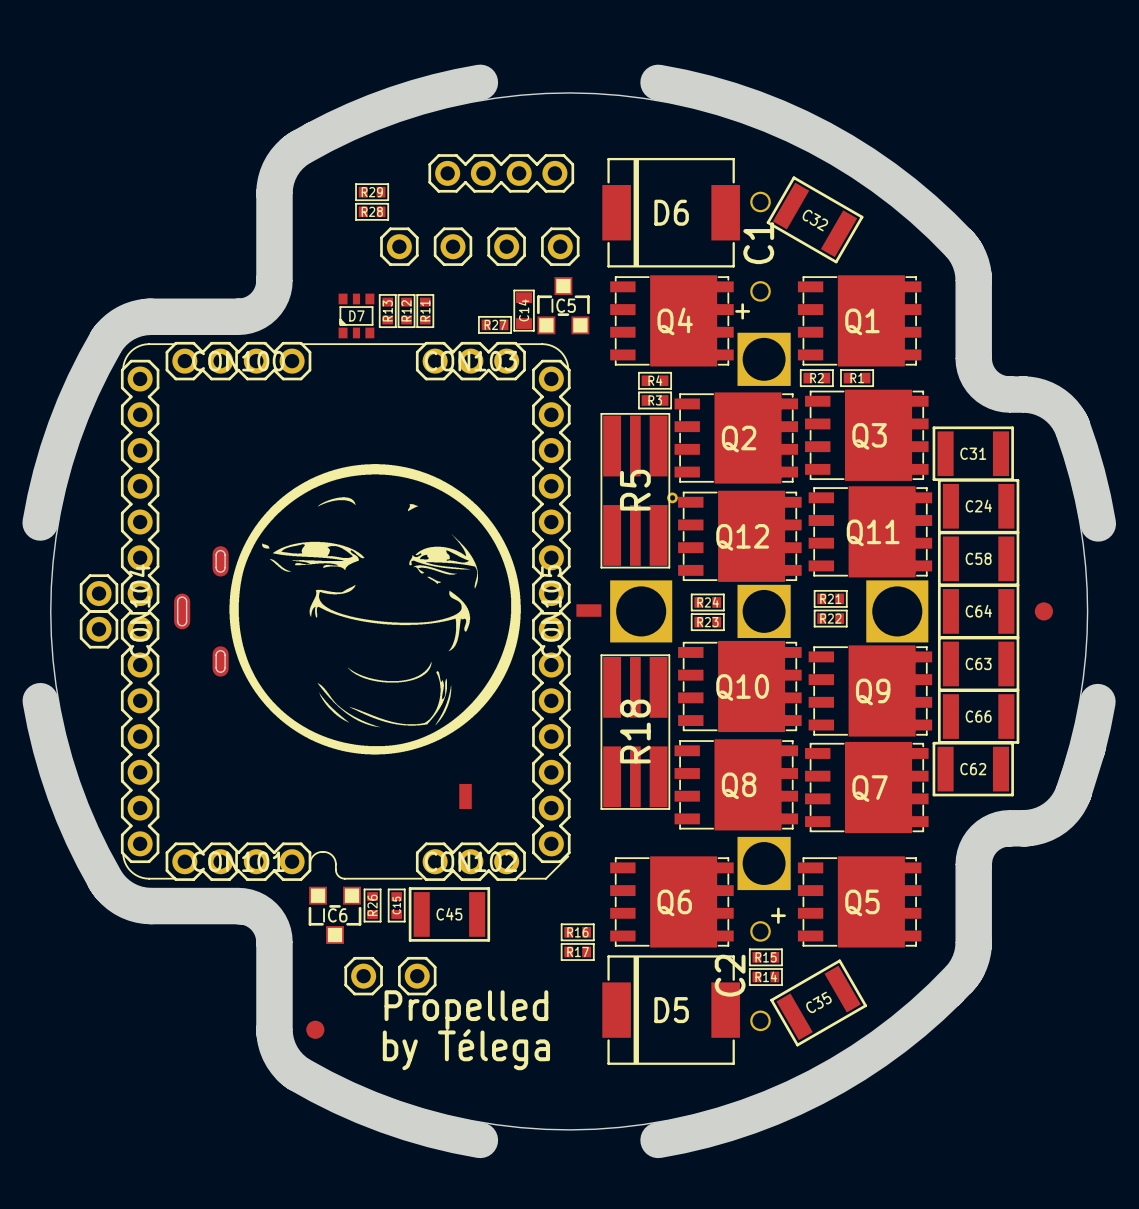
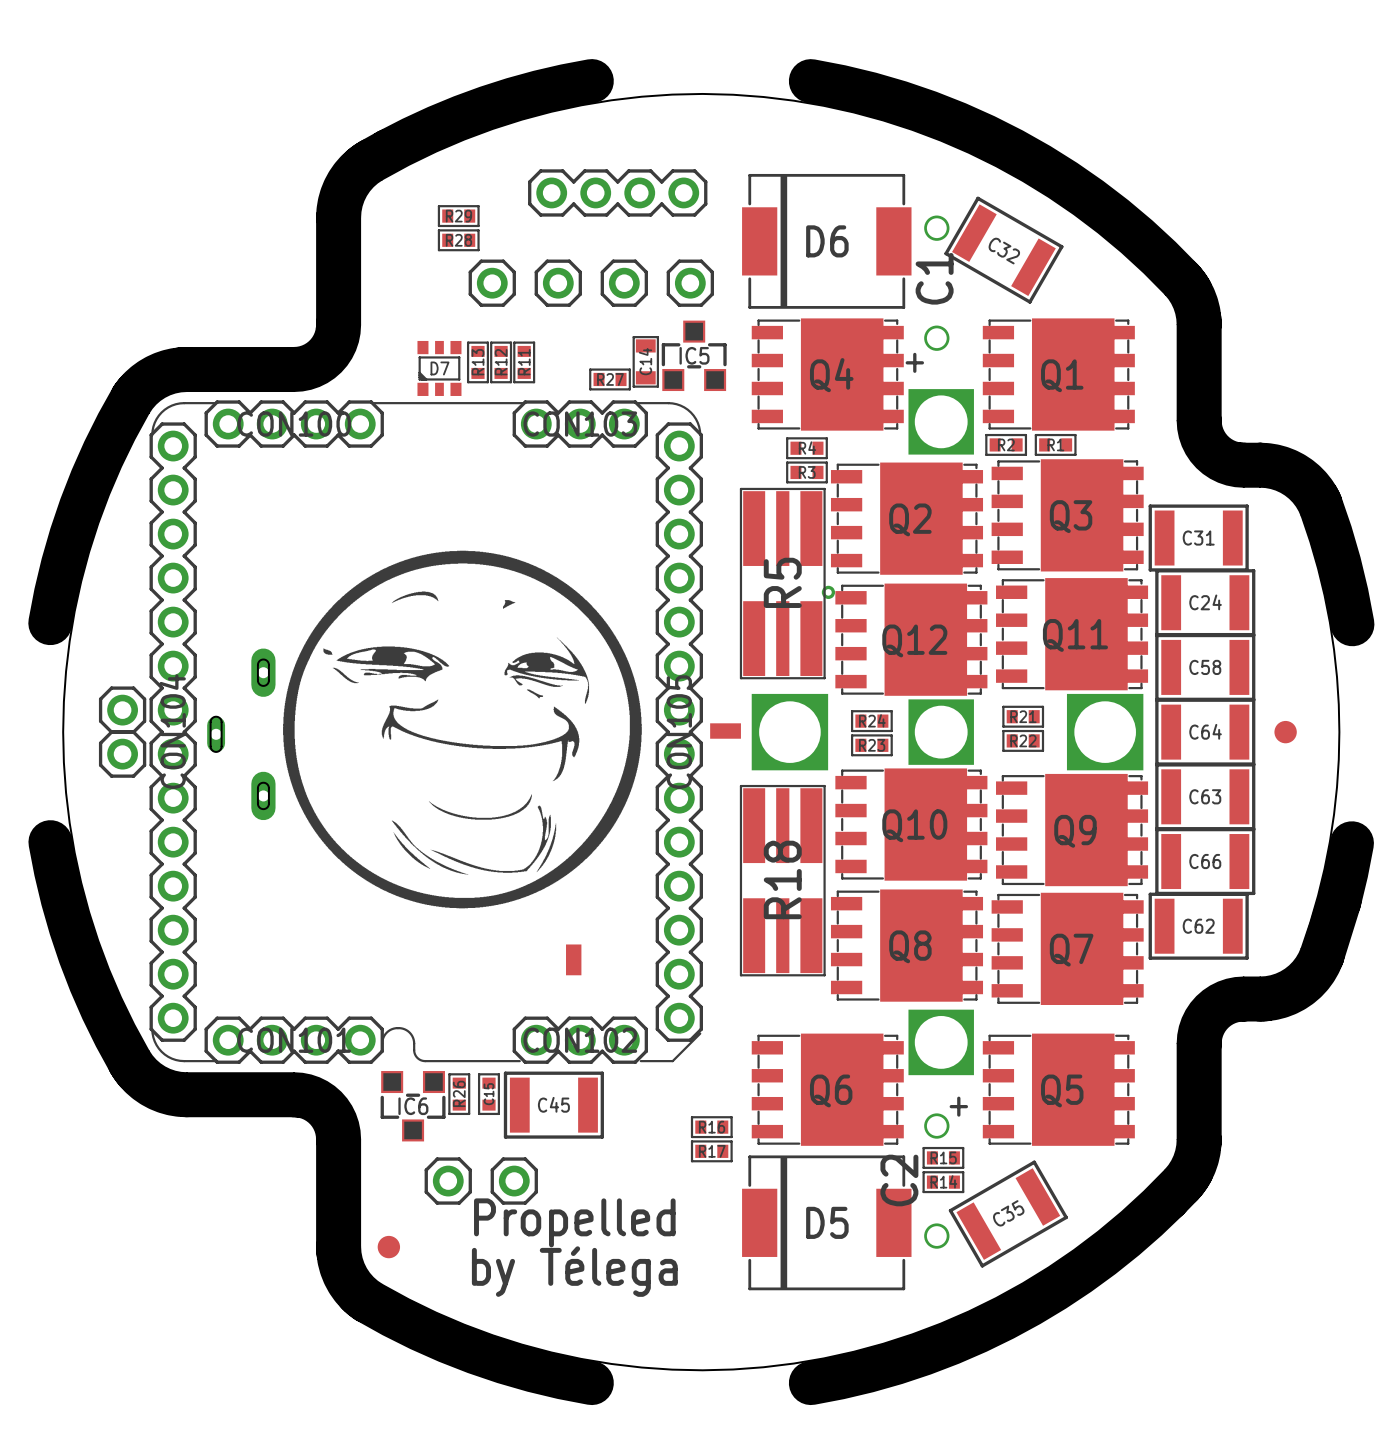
part footprint: [174, 546, 229, 677] -> [207, 648, 276, 821]

